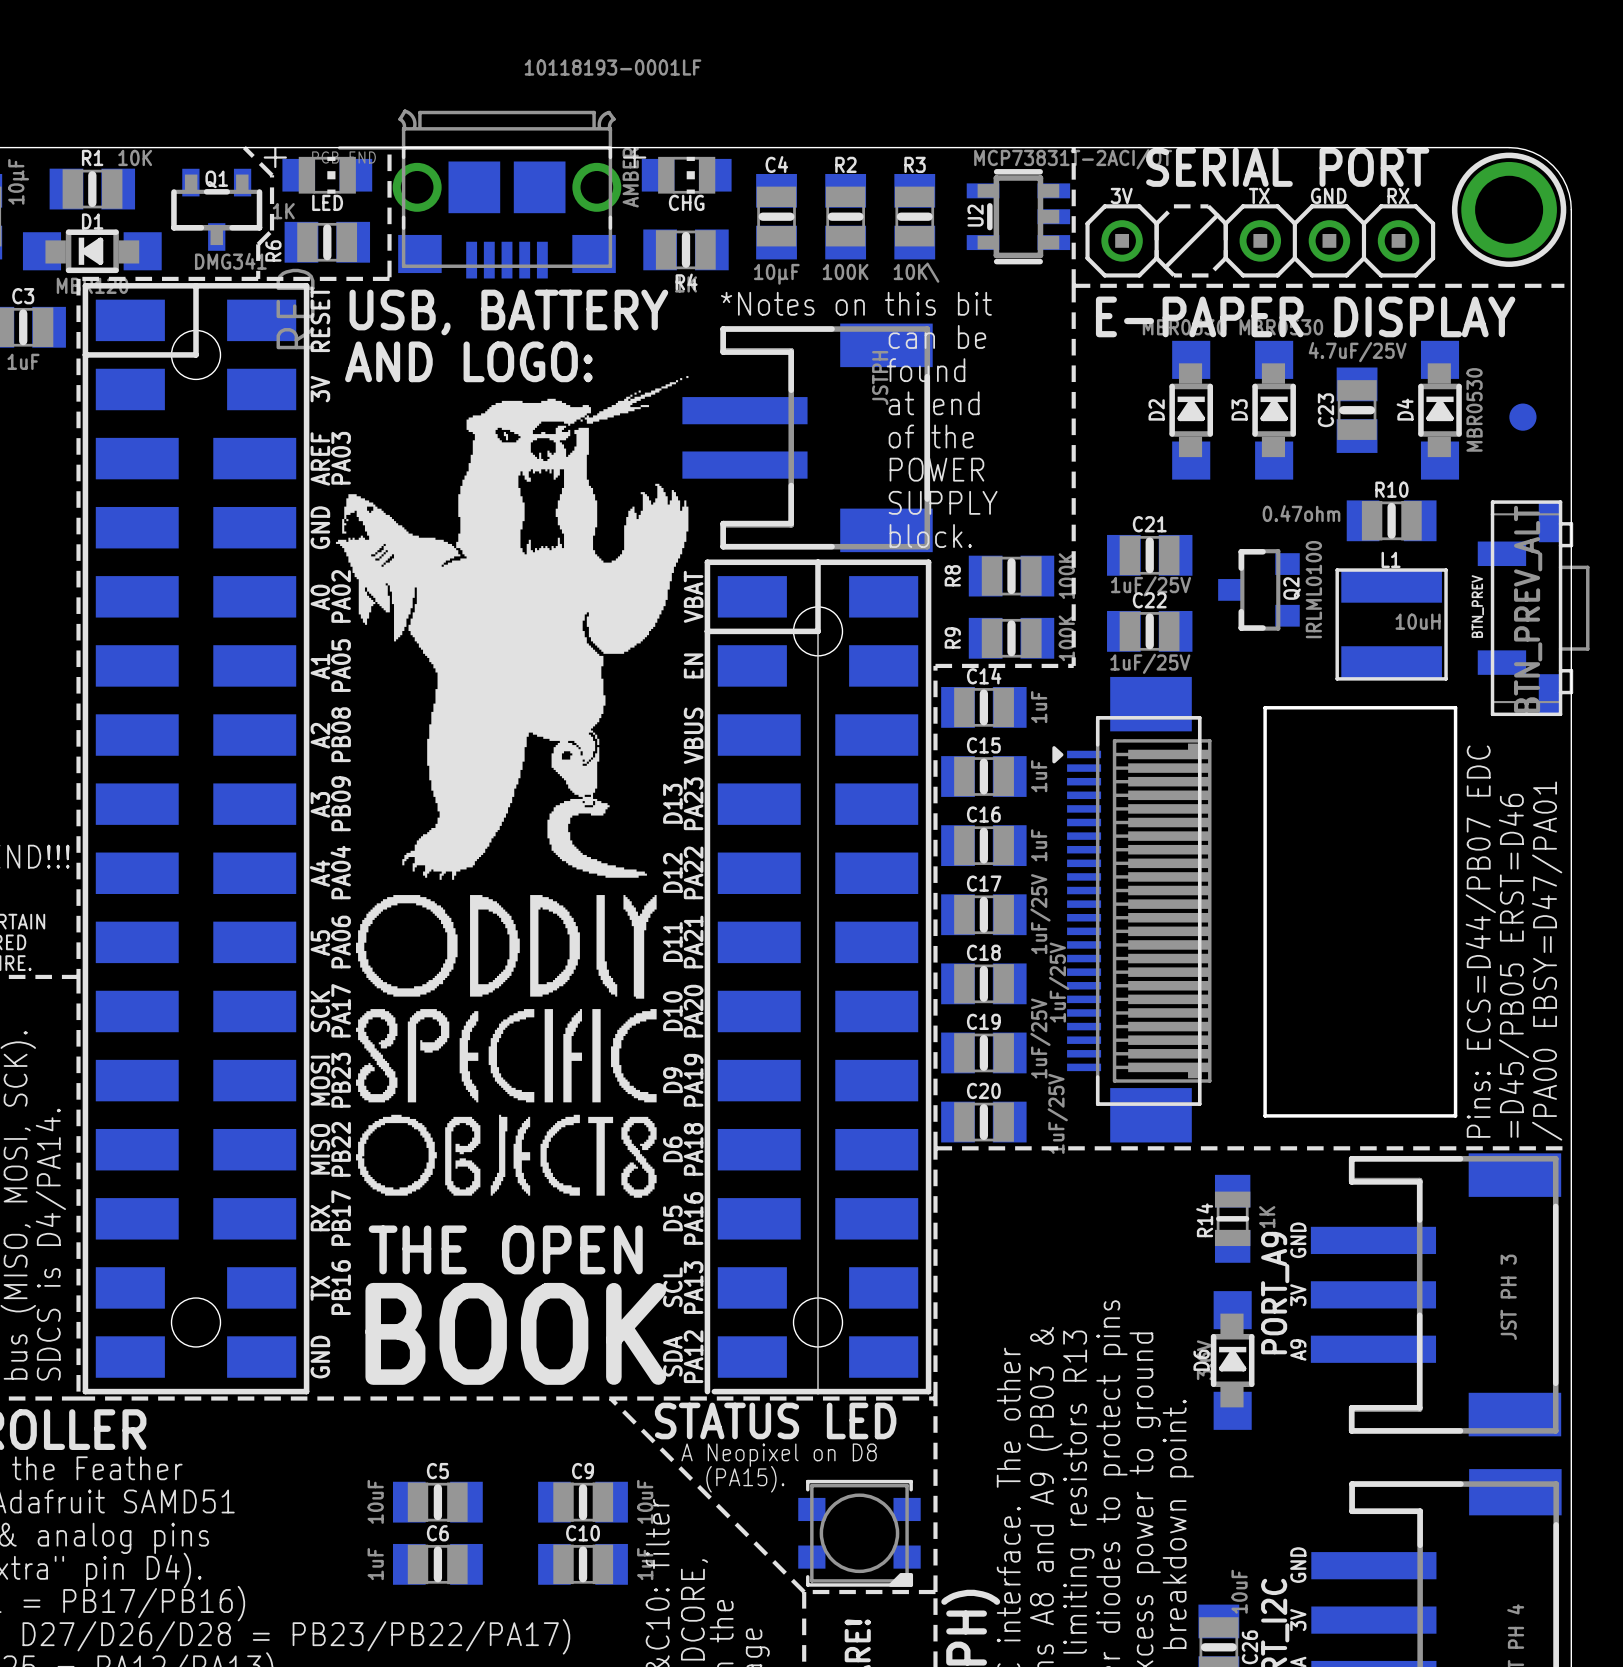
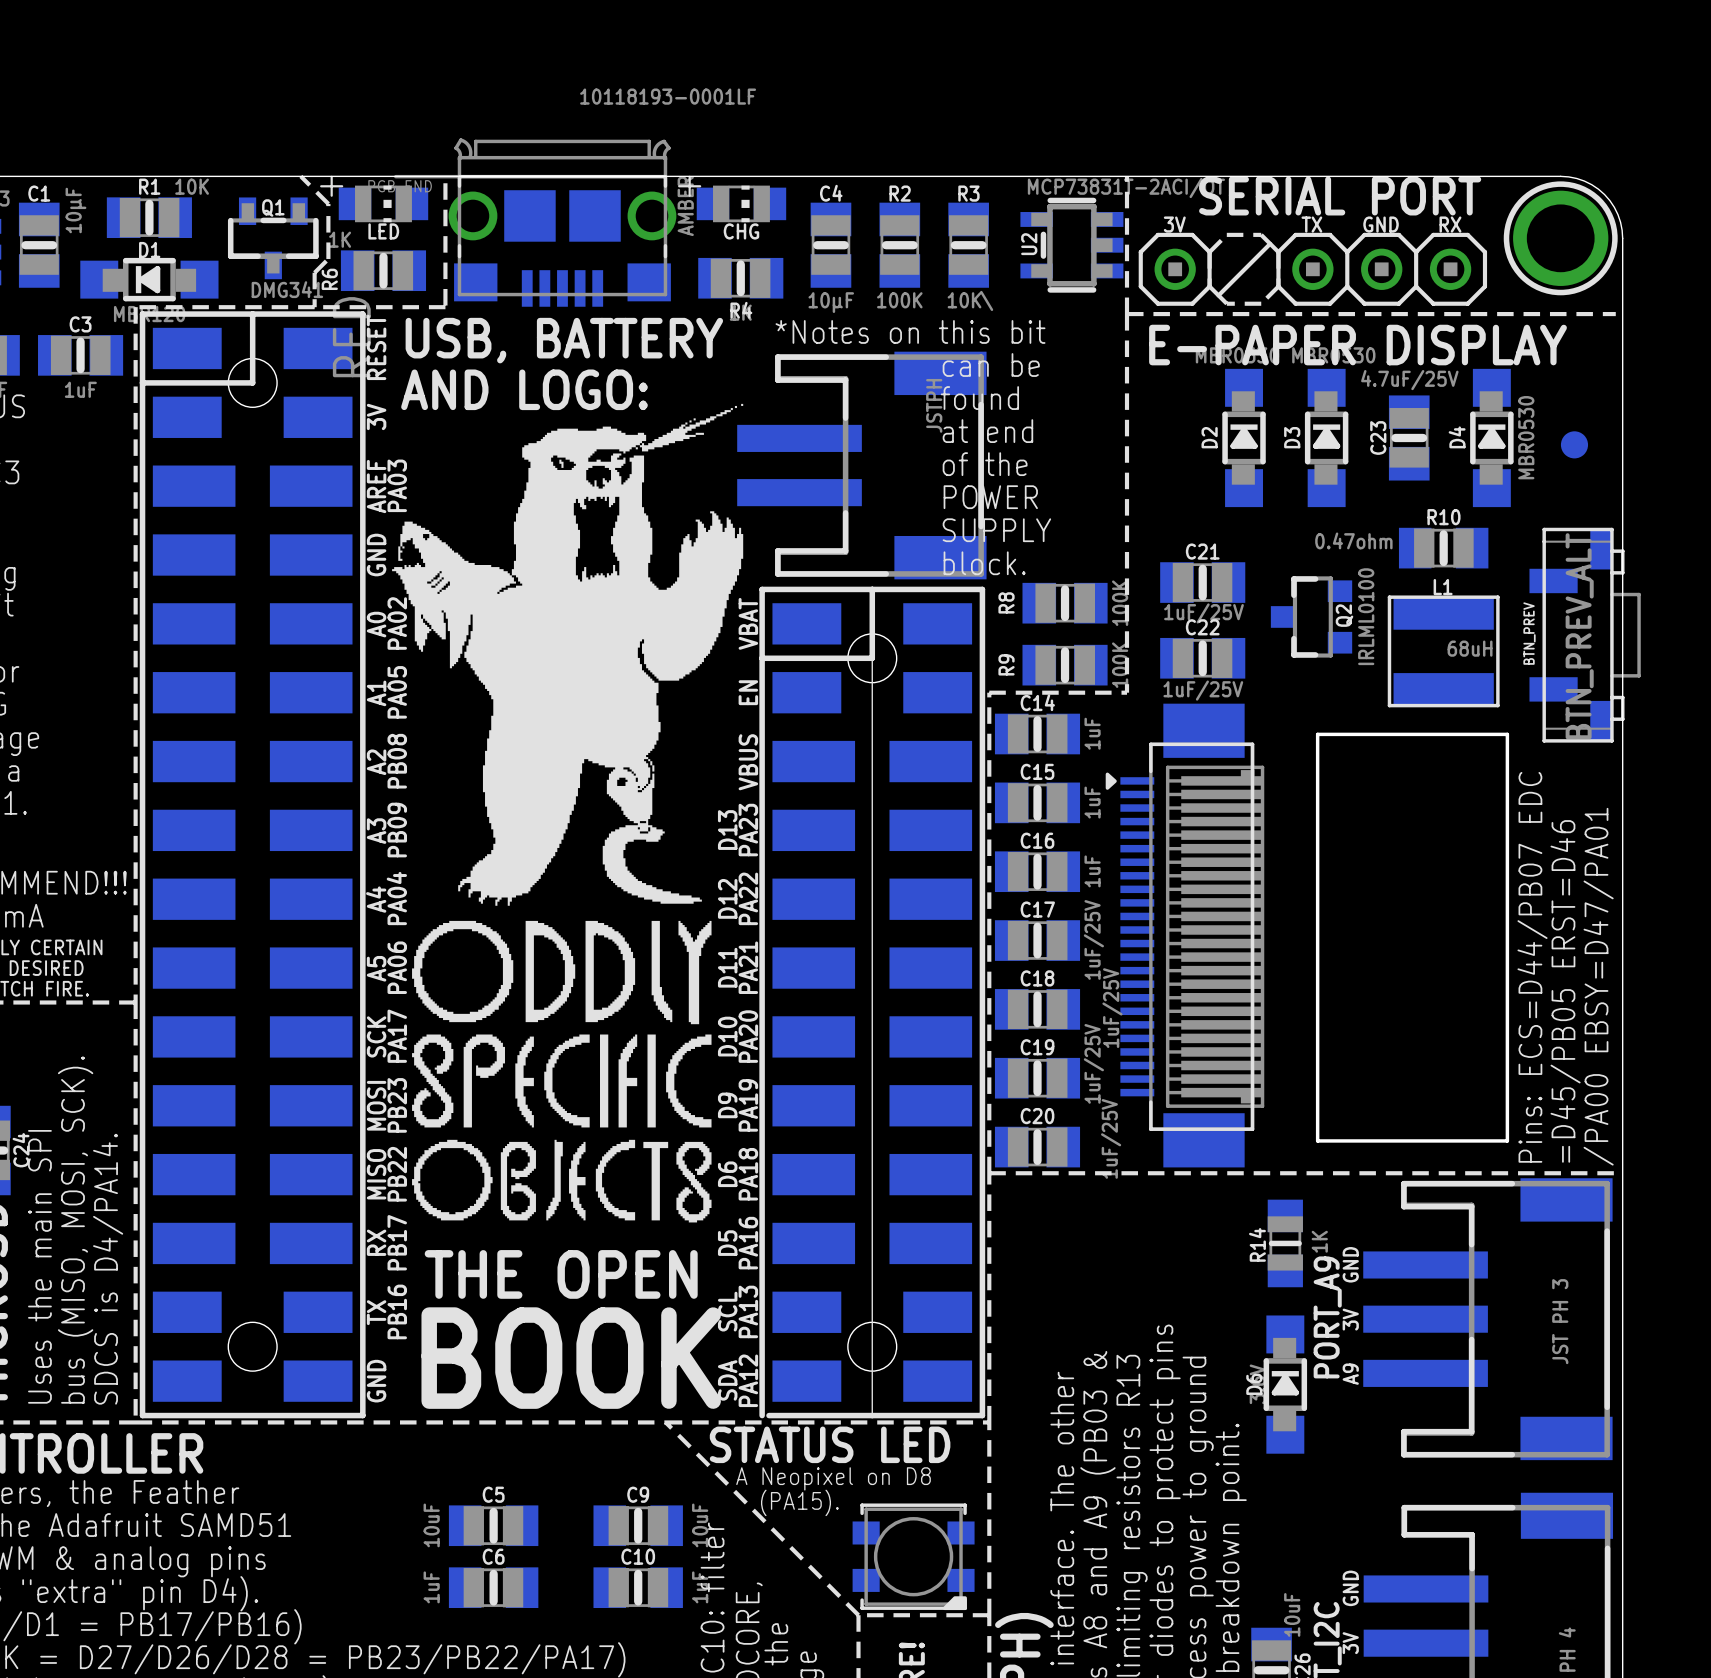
L1 value: 10uH (1418, 621) -> 68uH (1470, 648)

